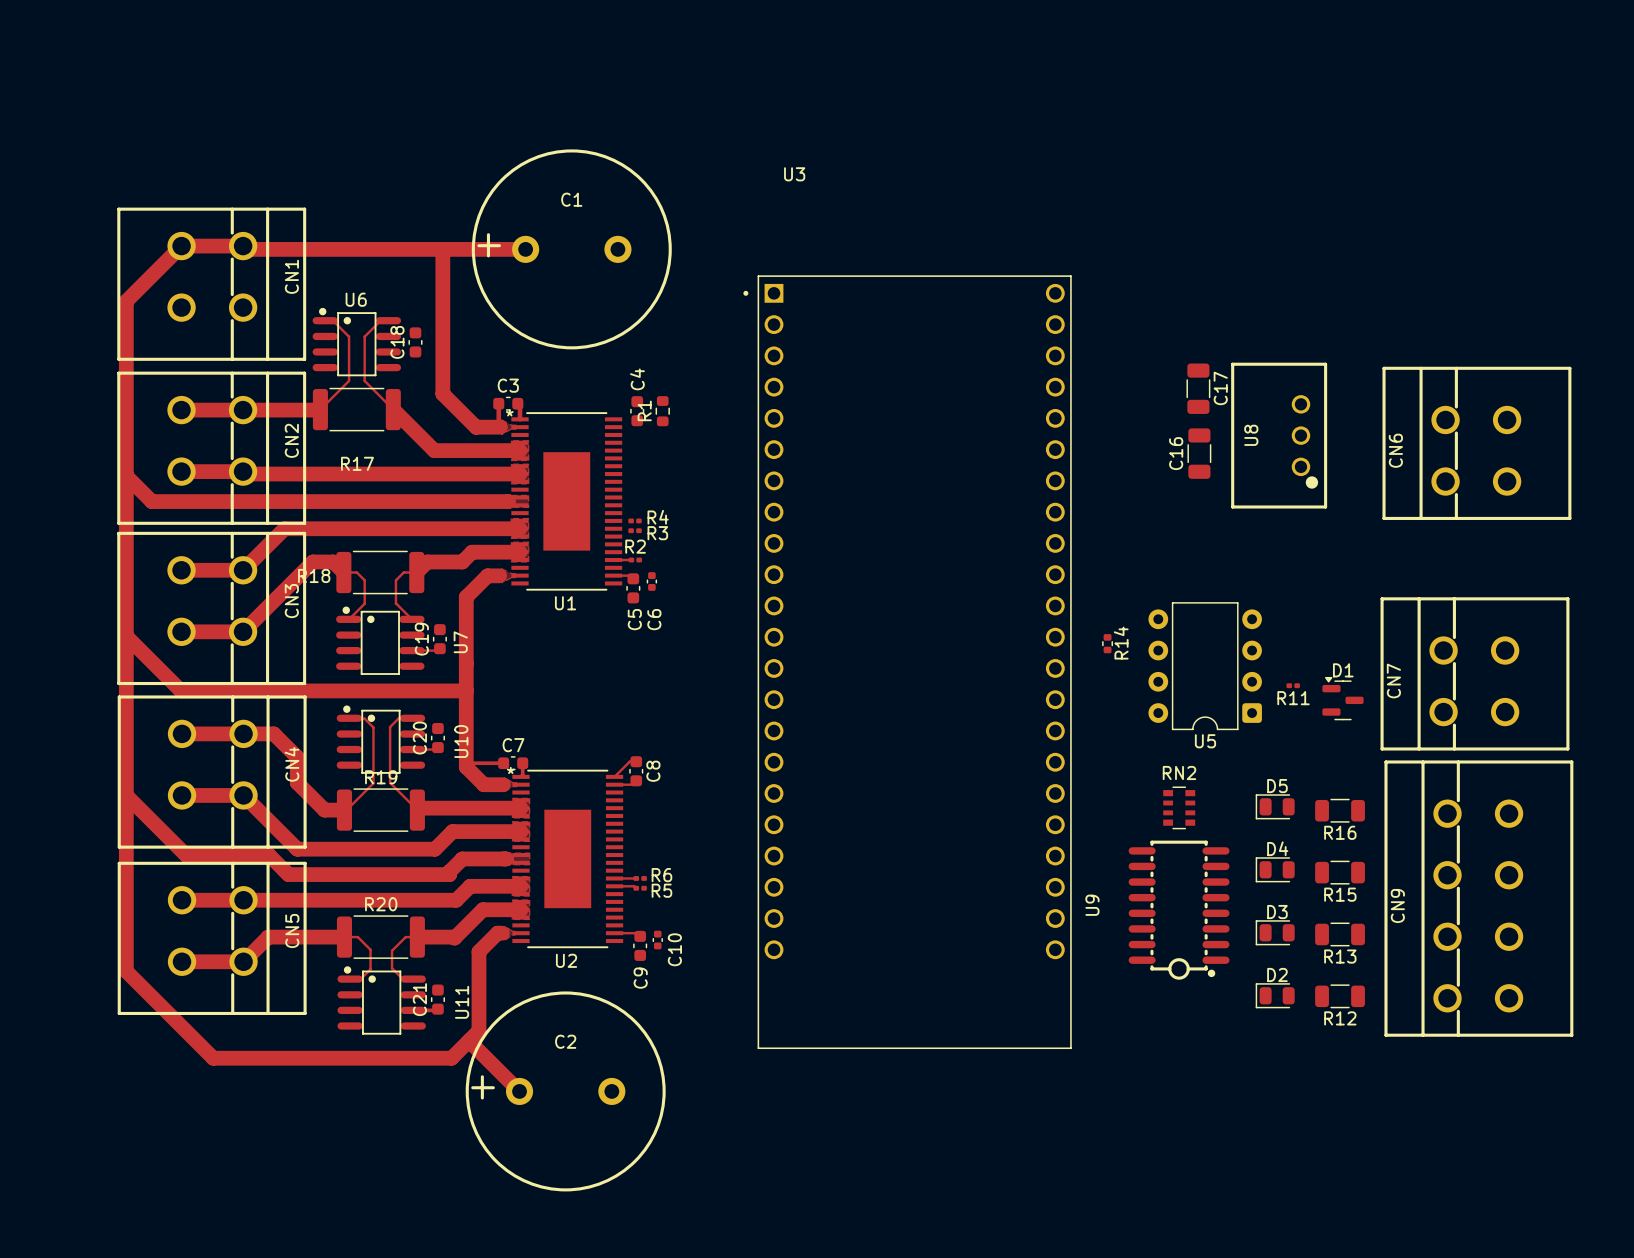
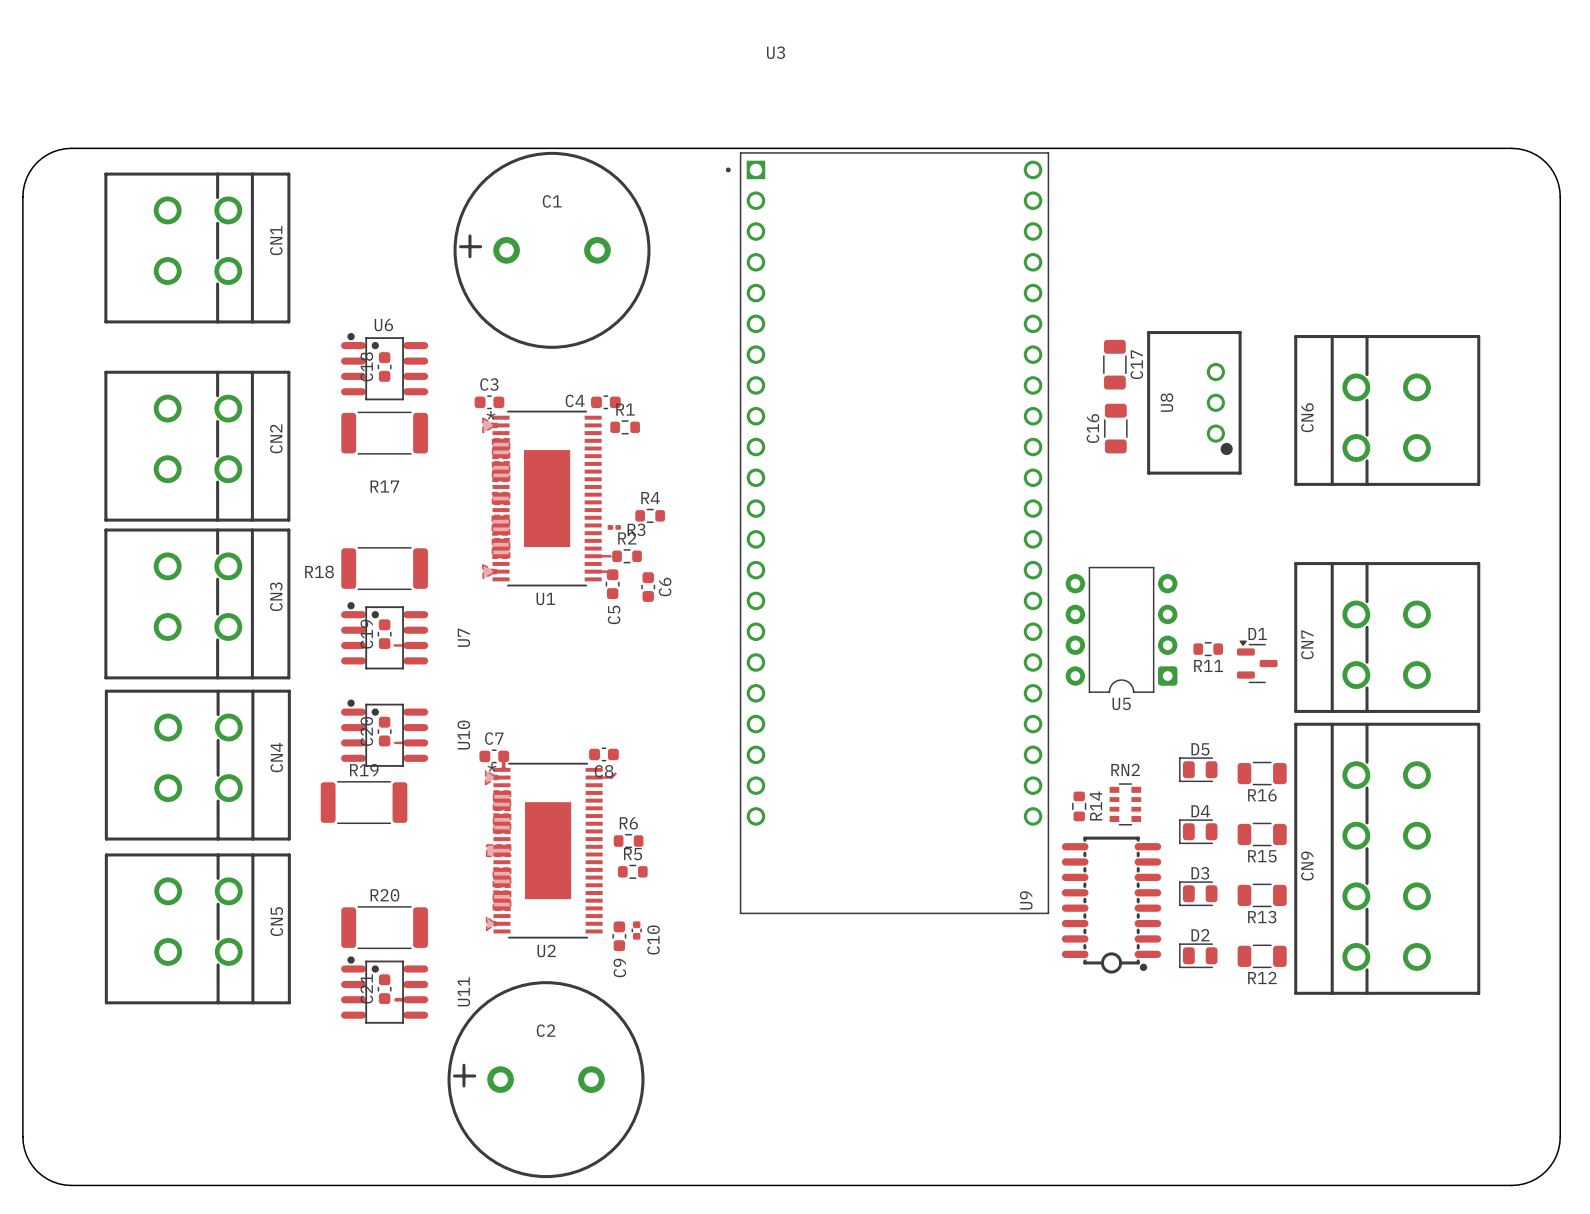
board edge: none -> (71, 148) (1511, 148) (1530, 152) (1541, 158) (1550, 167) (1556, 178) (1560, 196) (1560, 1136) (1556, 1155) (1550, 1166) (1535, 1178) (1524, 1183) (1511, 1185) (71, 1185) (52, 1181) (41, 1175) (32, 1166) (26, 1155) (22, 1136) (22, 196) (26, 178) (37, 162) (52, 152) (71, 148)
track: (442, 249) (442, 393) (476, 427) -> none
track: (525, 249) (246, 249) (243, 246) (181, 246) (126, 301) (126, 971) (213, 1058) (451, 1058) (478, 1030) (478, 951) (497, 933) (502, 933) -> none
CN1 position: (211, 284) -> (197, 247)
track: (333, 320) (349, 336) (349, 380) (320, 409) -> none
track: (388, 320) (380, 320) (364, 336) (364, 380) (434, 450) (520, 450) -> none
U6 position: (356, 342) -> (384, 366)
C18 position: (415, 342) -> (384, 366)
C4 name position: C4 (637, 379) -> C4 (575, 400)
C17 position: (1198, 388) -> (1114, 364)
track: (498, 403) (498, 425) (500, 427) (476, 427) -> none
track: (517, 403) (520, 405) (520, 419) -> none
track: (320, 409) (181, 410) -> none
R17 position: (356, 409) -> (384, 433)
C4 rotation: 0° (637, 411) -> 90° clockwise (605, 402)
R1 rotation: 0° (662, 411) -> 90° clockwise (625, 427)
R1 position: (662, 411) -> (625, 427)
U8 position: (1279, 435) -> (1194, 402)
CN6 position: (1476, 443) -> (1387, 410)
C16 position: (1199, 453) -> (1115, 428)
track: (181, 471) (247, 472) -> none
track: (243, 471) (245, 474) (520, 474) -> none
track: (126, 476) (151, 501) (508, 501) -> none
R4 name position: R4 (658, 517) -> R4 (650, 498)
R4 footprint: [628, 518, 642, 524] -> [635, 508, 665, 523]
track: (520, 528) (284, 528) (243, 570) (181, 570) -> none
track: (520, 552) (472, 552) (462, 561) (427, 561) (416, 572) (403, 572) (395, 580) (395, 603) (411, 619) -> none
R2 footprint: [628, 557, 643, 563] -> [612, 549, 642, 564]
R18 position: (380, 572) -> (384, 568)
C6 footprint: [646, 572, 658, 591] -> [641, 572, 656, 602]
track: (499, 575) (487, 575) (466, 597) (466, 767) -> none
track: (348, 619) (364, 603) (364, 580) (356, 572) (343, 572) (333, 561) (312, 561) (243, 631) (181, 631) -> none
C6 name position: C6 (654, 619) -> C6 (665, 587)
R14 footprint: [1102, 634, 1113, 654] -> [1072, 791, 1087, 822]
track: (126, 636) (181, 690) (466, 690) -> none
C19 position: (439, 639) -> (384, 634)
U7 position: (380, 640) -> (384, 635)
U3 position: (907, 662) -> (887, 533)
U5 position: (1205, 666) -> (1121, 629)
CN7 position: (1474, 673) -> (1387, 637)
R11 footprint: [1286, 683, 1300, 689] -> [1193, 642, 1224, 657]
D1 position: (1342, 698) -> (1257, 661)
track: (351, 718) (364, 718) (373, 727) (373, 783) (346, 810) -> none
track: (412, 718) (398, 718) (390, 727) (390, 782) (417, 810) (419, 808) (520, 808) -> none
track: (182, 733) (273, 733) (297, 757) (297, 782) (324, 810) (339, 810) -> none
C20 position: (437, 738) -> (384, 731)
U10 position: (380, 739) -> (384, 733)
track: (636, 761) (629, 761) (614, 776) -> none
track: (503, 763) (470, 763) (466, 767) -> none
track: (466, 767) (483, 784) (503, 784) -> none
C8 rotation: 0° (636, 771) -> 90° clockwise (603, 754)
track: (126, 795) (185, 855) (268, 855) (288, 874) (449, 874) (449, 871) (462, 858) (506, 858) -> none
track: (182, 795) (243, 795) (297, 849) (435, 849) (452, 831) (520, 831) -> none
D5 position: (1275, 806) -> (1198, 769)
RN2 position: (1179, 807) -> (1125, 804)
R16 position: (1340, 810) -> (1262, 773)
D4 position: (1275, 869) -> (1198, 831)
R15 position: (1340, 872) -> (1262, 834)
R6 name position: R6 (661, 875) -> R6 (628, 823)
R6 footprint: [633, 876, 647, 881] -> [613, 833, 644, 849]
track: (614, 878) (636, 878) -> none
R5 footprint: [633, 885, 647, 891] -> [617, 864, 648, 879]
track: (520, 886) (470, 886) (456, 900) (182, 900) -> none
track: (614, 886) (634, 886) (636, 888) -> none
R5 name position: R5 (661, 890) -> R5 (633, 854)
CN9 position: (1478, 898) -> (1387, 858)
track: (520, 909) (482, 909) (454, 938) (405, 937) (392, 950) (392, 968) (402, 979) (413, 979) -> none
U9 position: (1179, 910) -> (1111, 905)
D3 position: (1275, 932) -> (1198, 893)
track: (614, 933) (637, 933) (640, 936) -> none
R13 position: (1340, 934) -> (1262, 895)
R20 position: (380, 937) -> (384, 927)
track: (182, 961) (243, 961) (268, 937) (357, 937) (370, 949) (370, 969) (360, 979) (350, 979) -> none
D2 position: (1275, 995) -> (1198, 955)
R12 position: (1340, 996) -> (1262, 956)
C21 position: (437, 999) -> (384, 989)
U11 position: (381, 1000) -> (384, 990)
track: (468, 1040) (519, 1091) -> none

